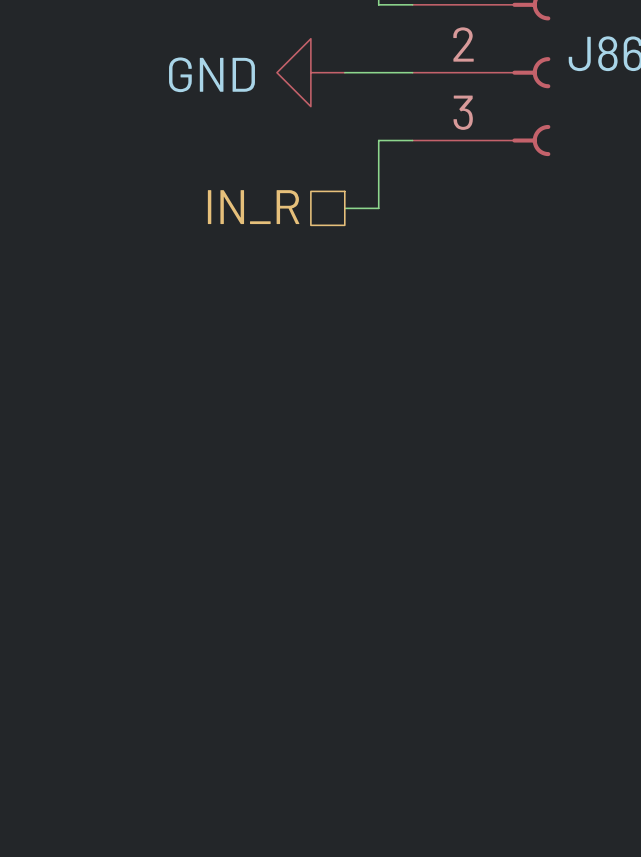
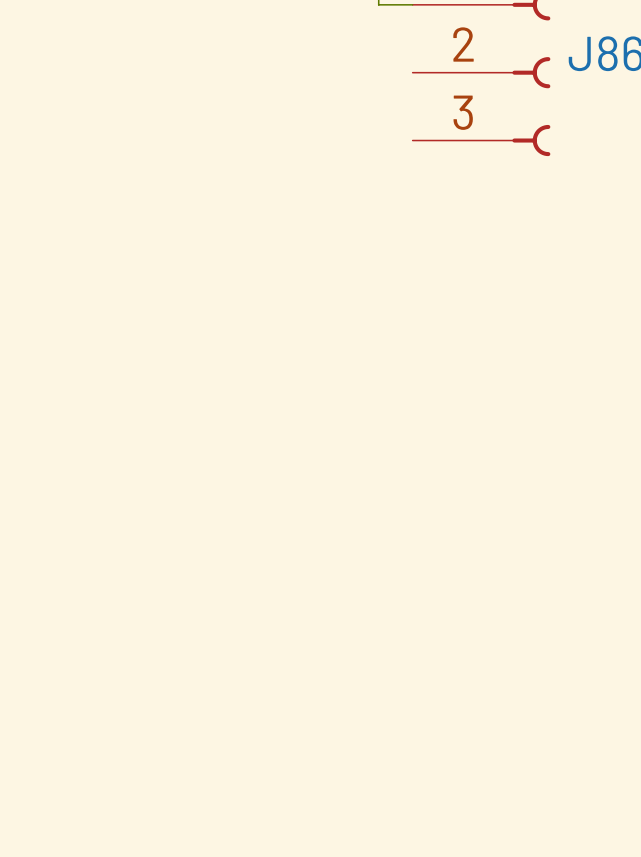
power symbol: GND (310, 72) -> none
wire: (344, 72) (412, 72) -> none
wire: (412, 140) (378, 140) (378, 208) (344, 208) -> none
hierarchical label: IN_R (253, 207) -> none

